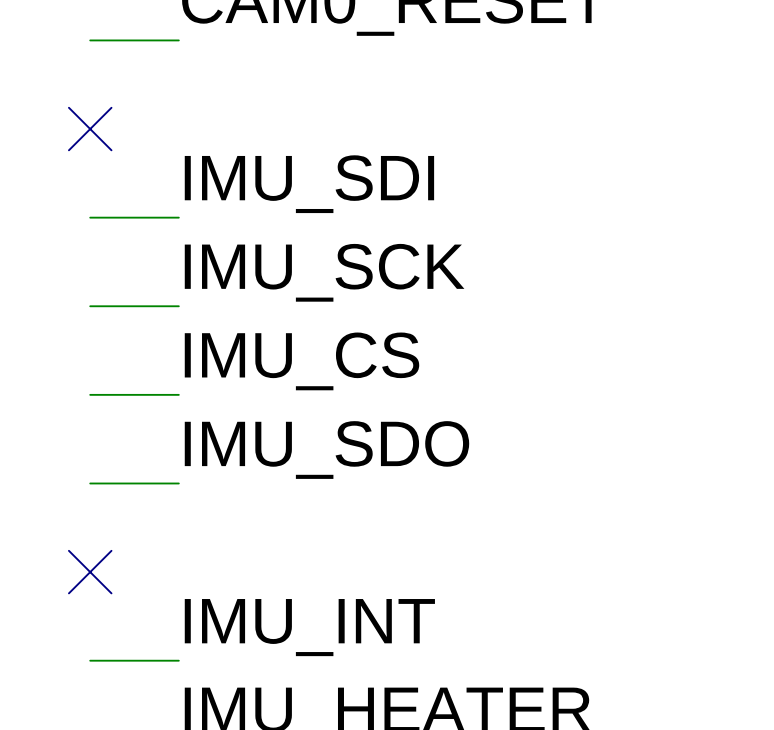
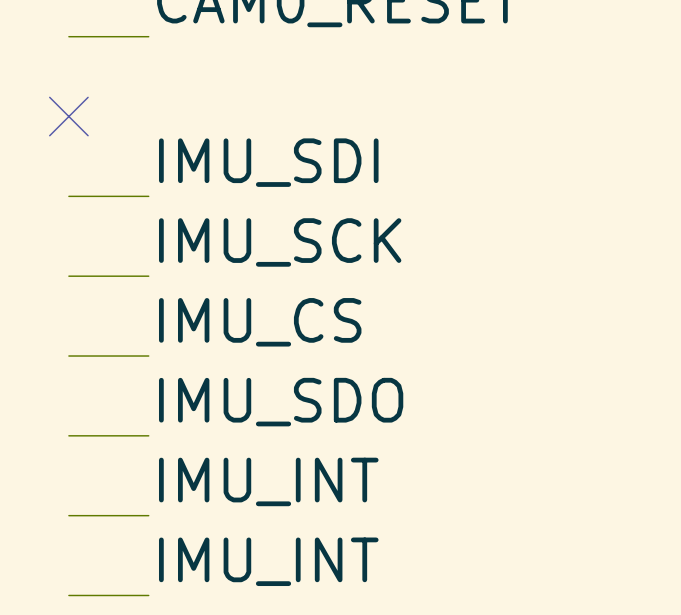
label: none -> IMU_INT (268, 481)
wire: none -> (68, 515) (148, 515)
no-connect mark: (90, 572) -> none

